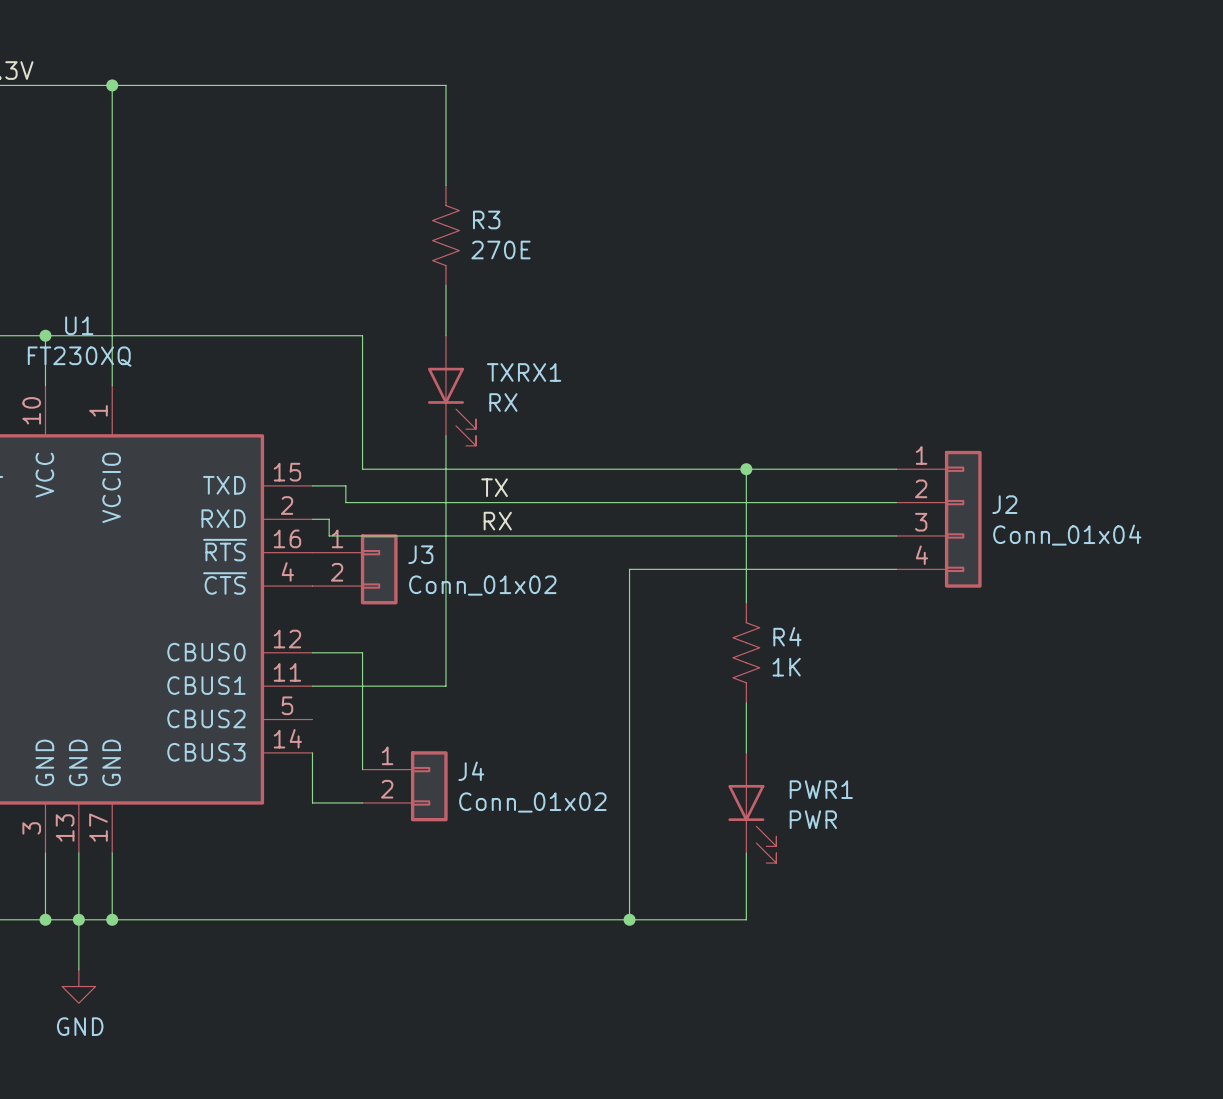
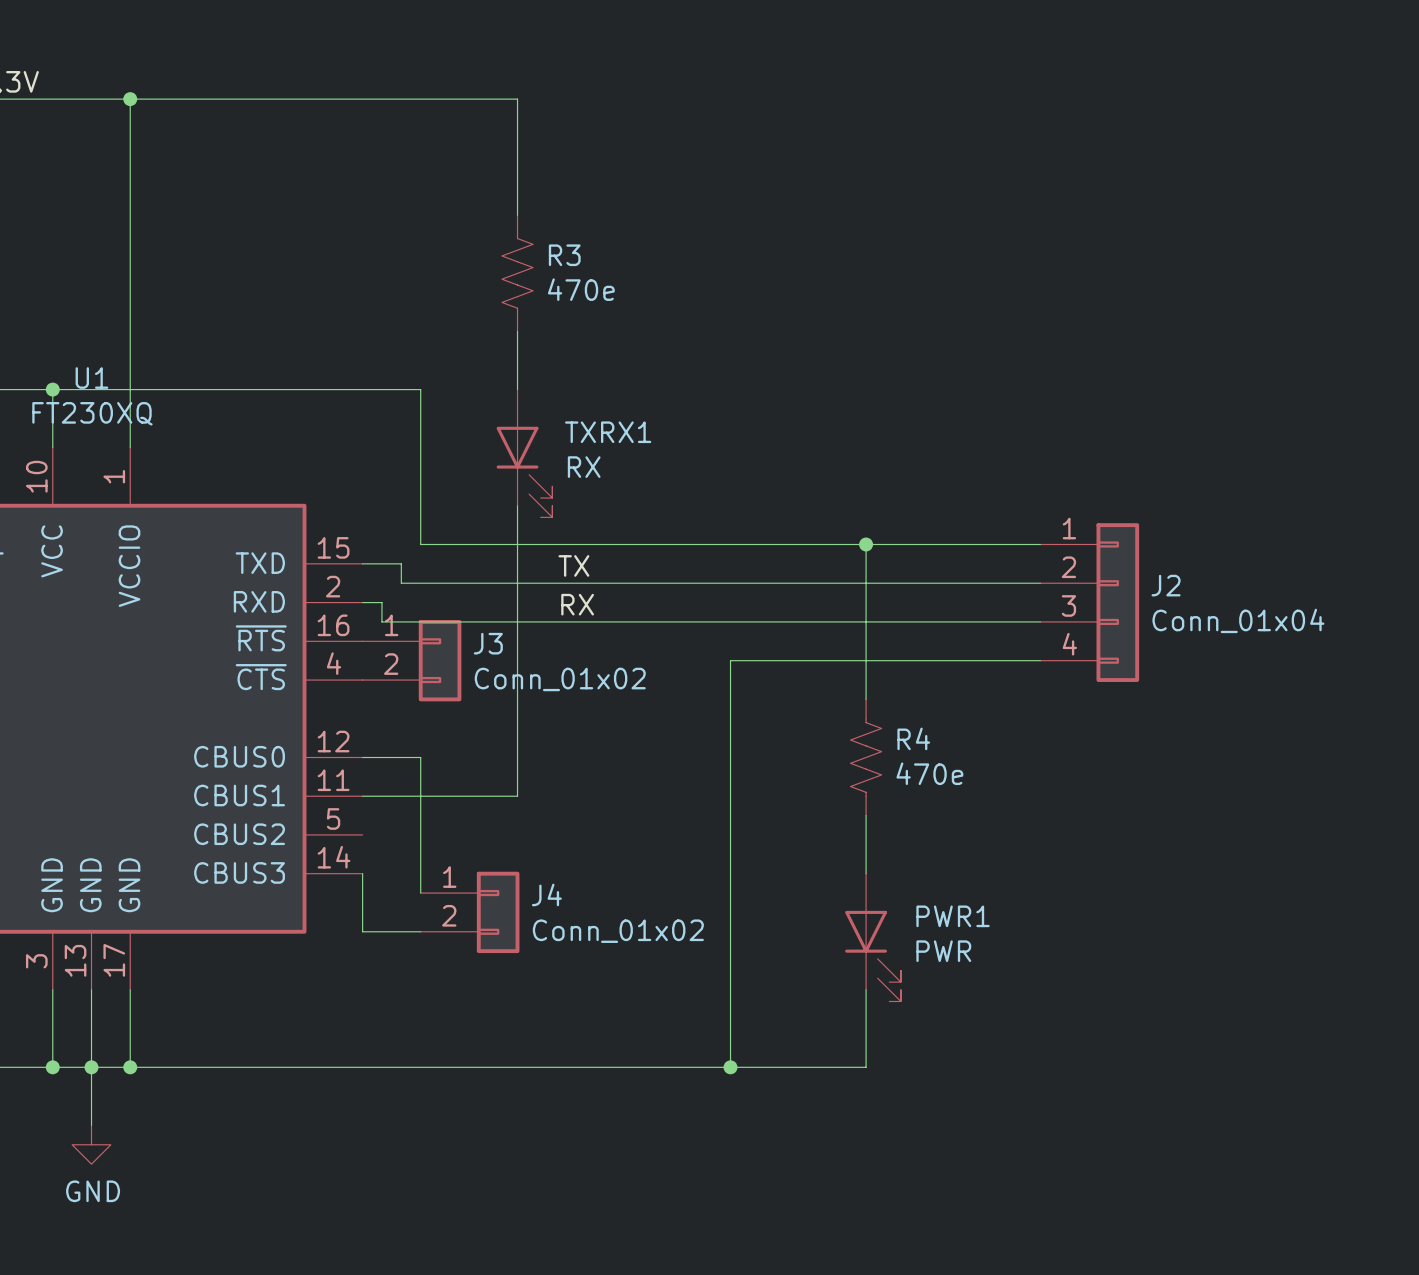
R3 value: 270E (500, 250) -> 470e (581, 289)
R4 value: 1K (786, 667) -> 470e (929, 773)

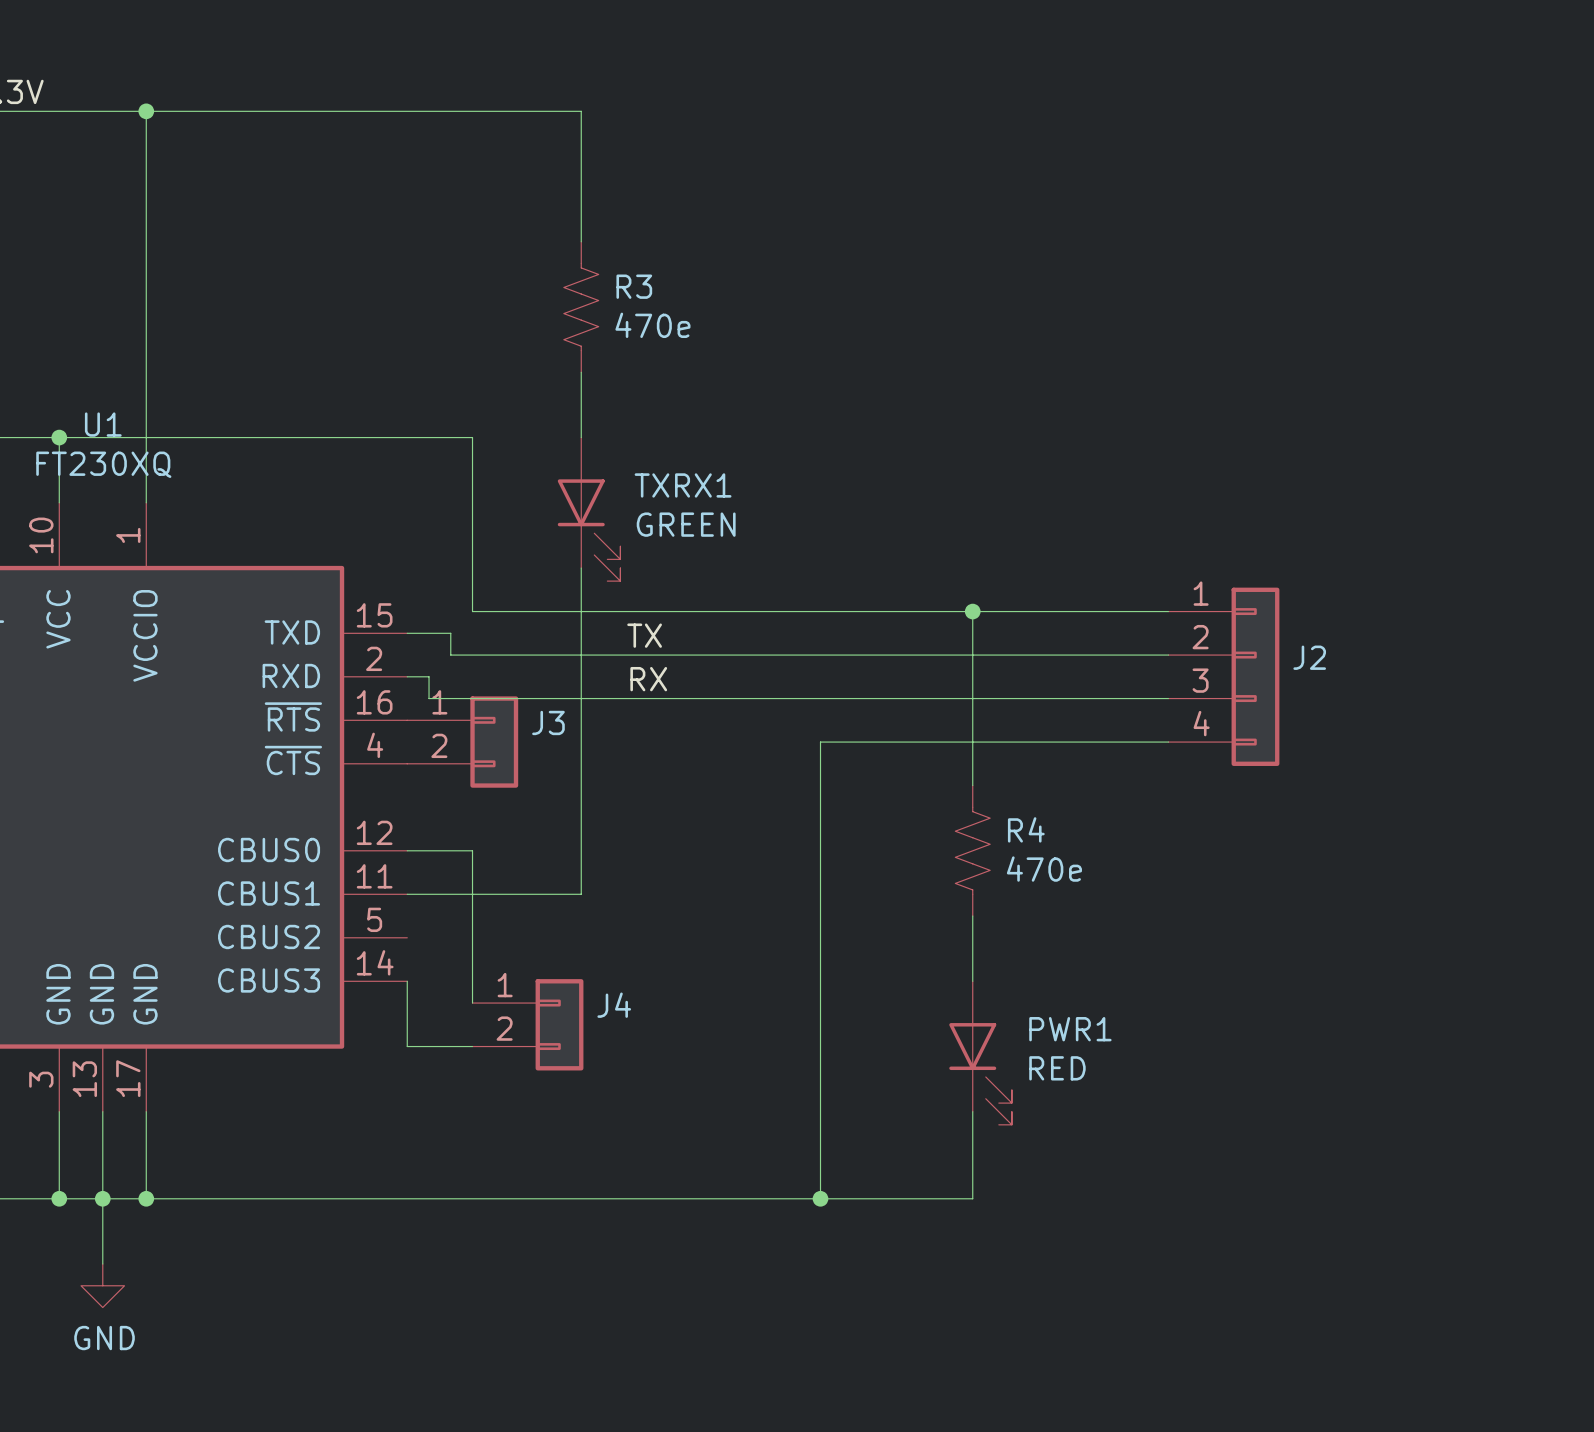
TXRX1 value: RX (584, 467) -> GREEN (686, 524)
J2 value: Conn_01x04 (1238, 620) -> none
J3 value: Conn_01x02 (560, 679) -> none
J4 value: Conn_01x02 (618, 931) -> none
PWR1 value: PWR (943, 951) -> RED (1057, 1068)

